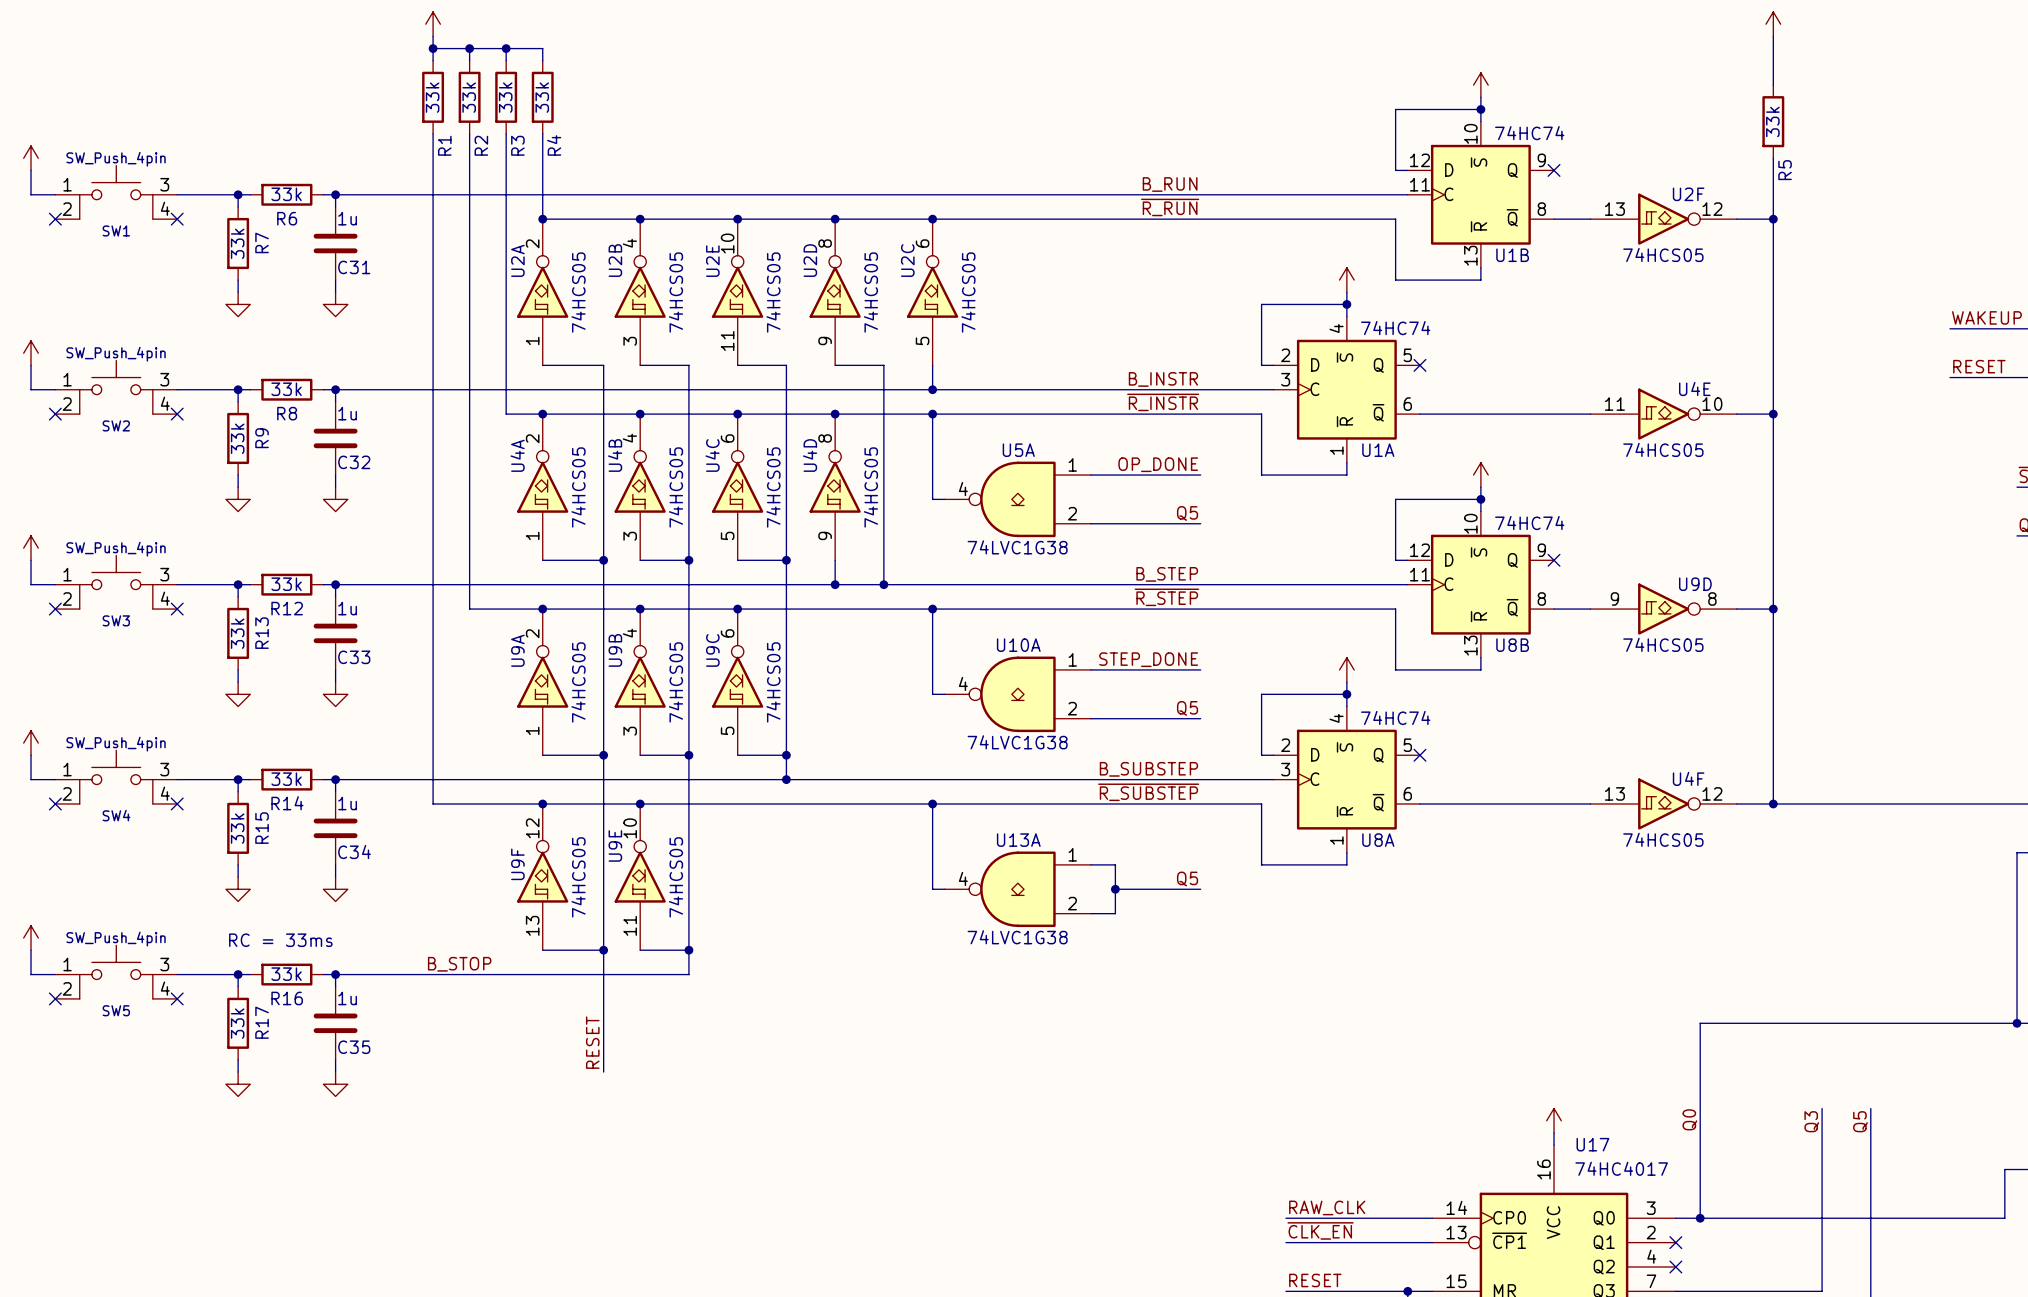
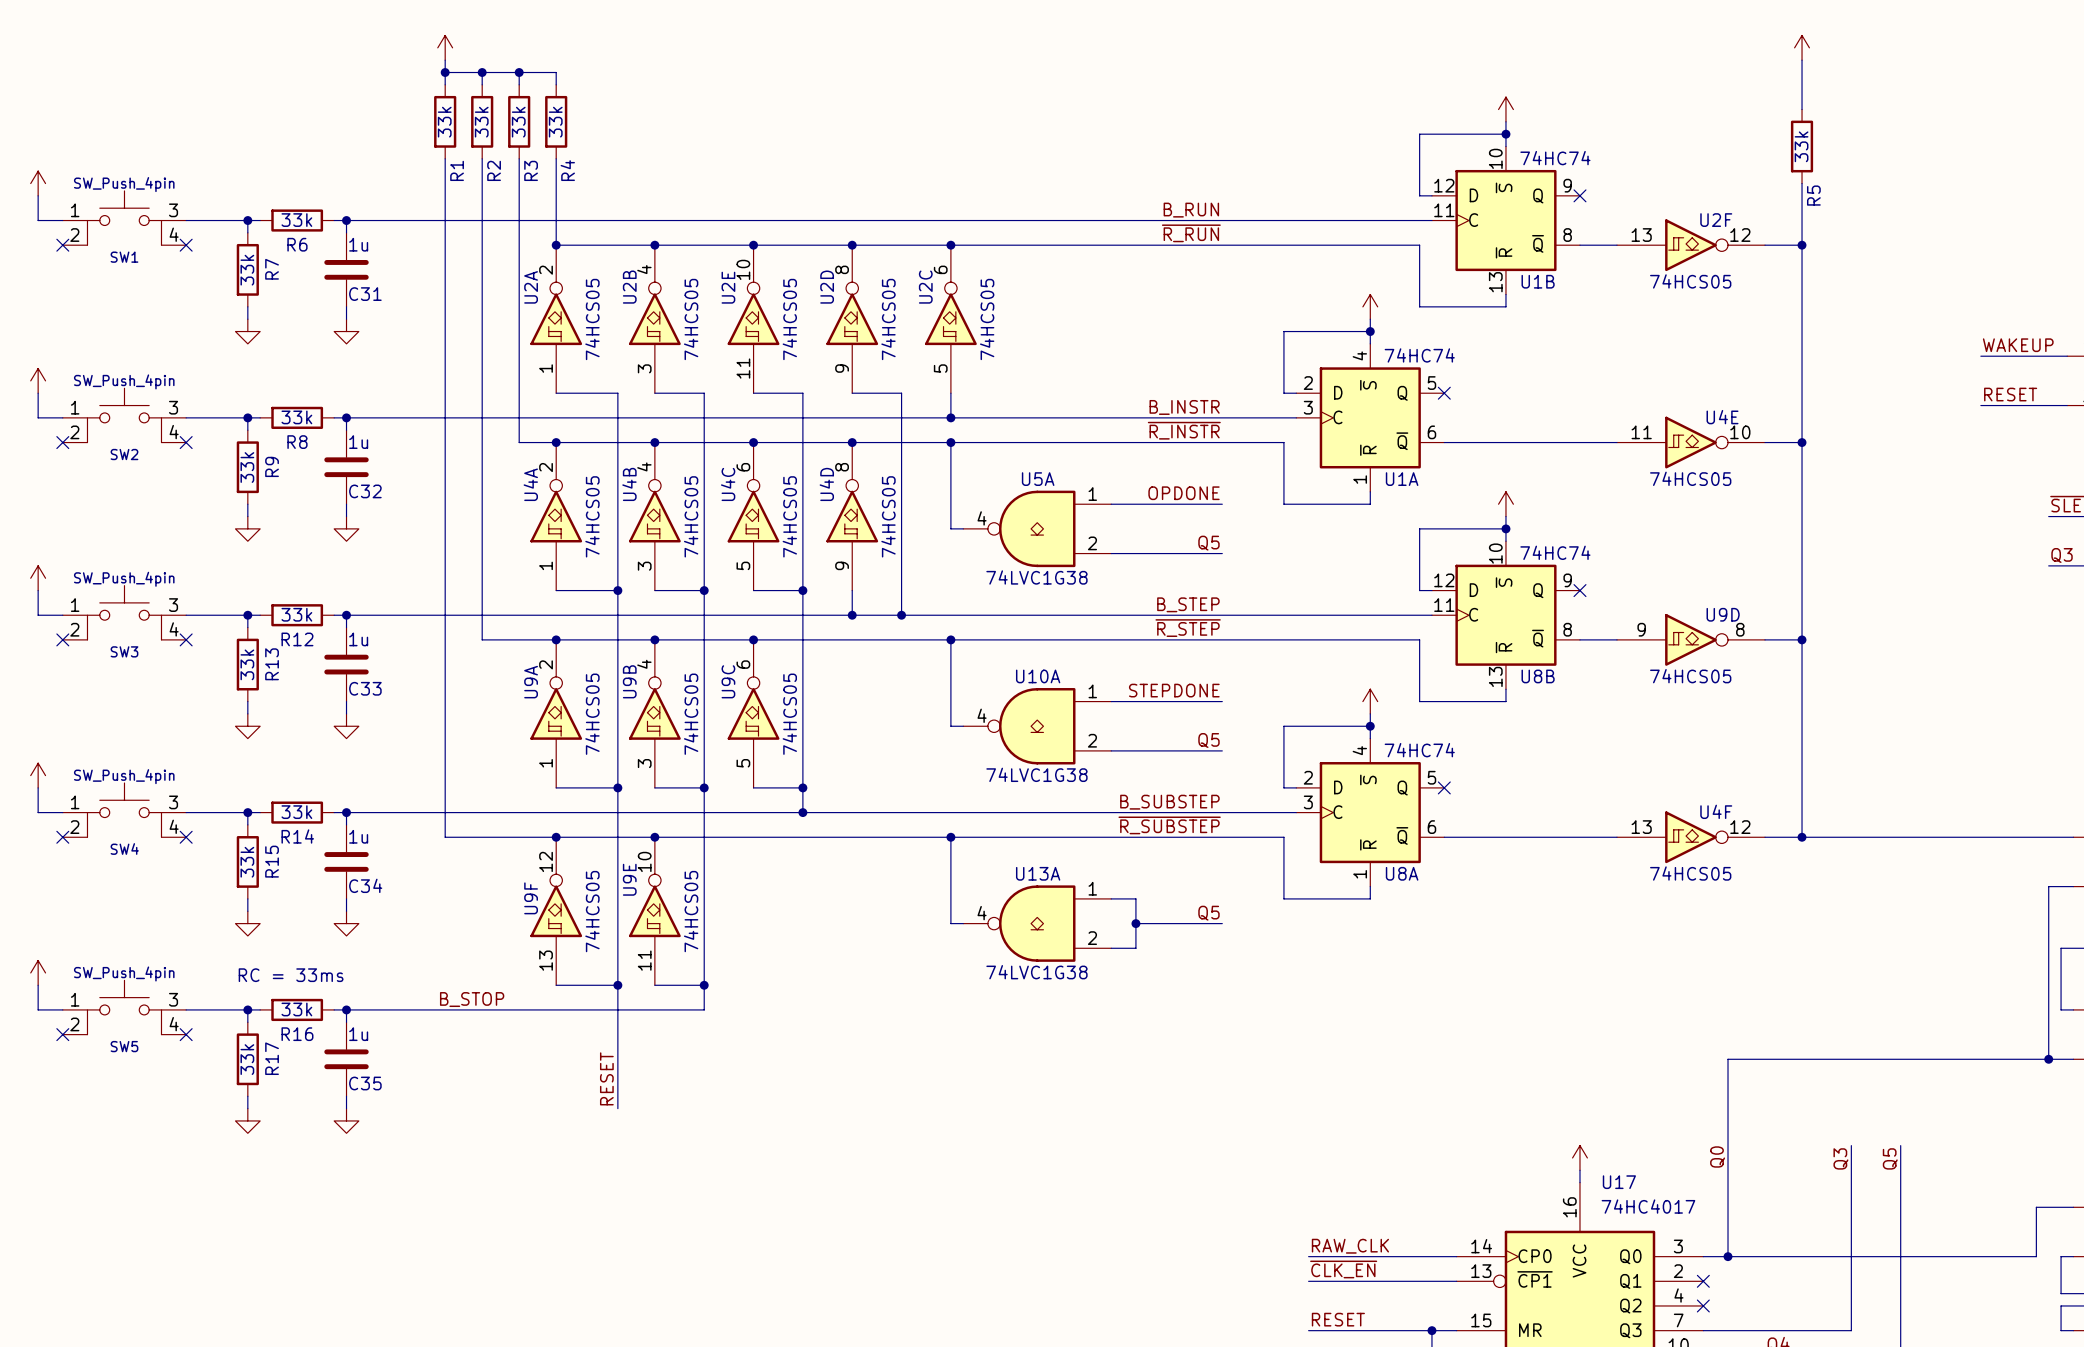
label: OP_DONE (1158, 464) -> OPDONE (1184, 493)
label: STEP_DONE (1148, 659) -> STEPDONE (1174, 690)

